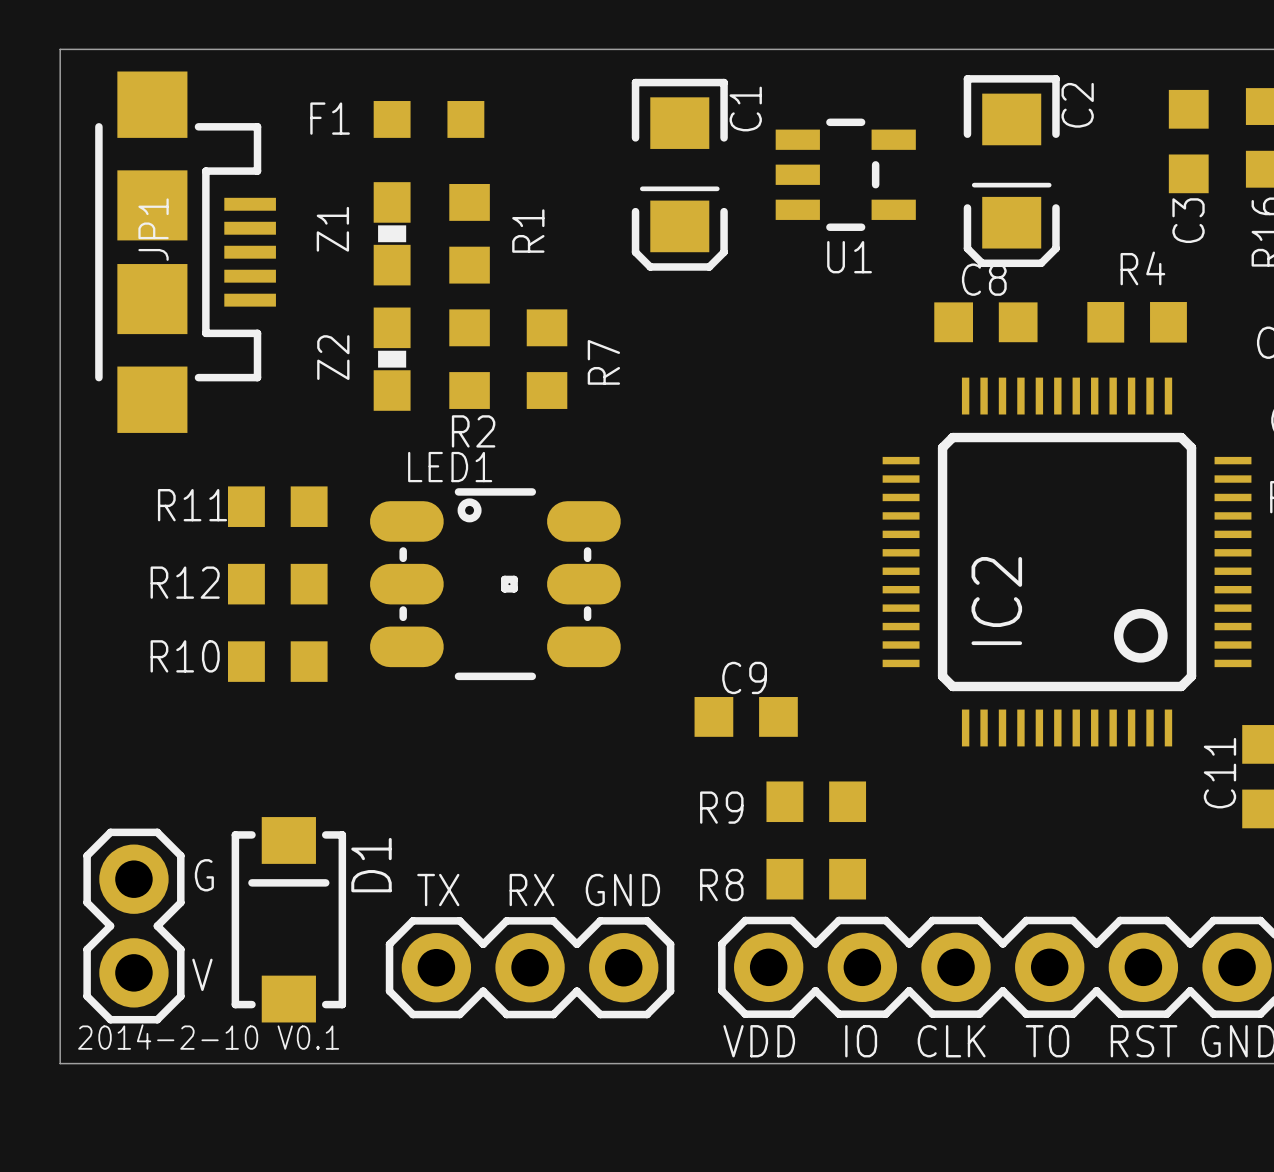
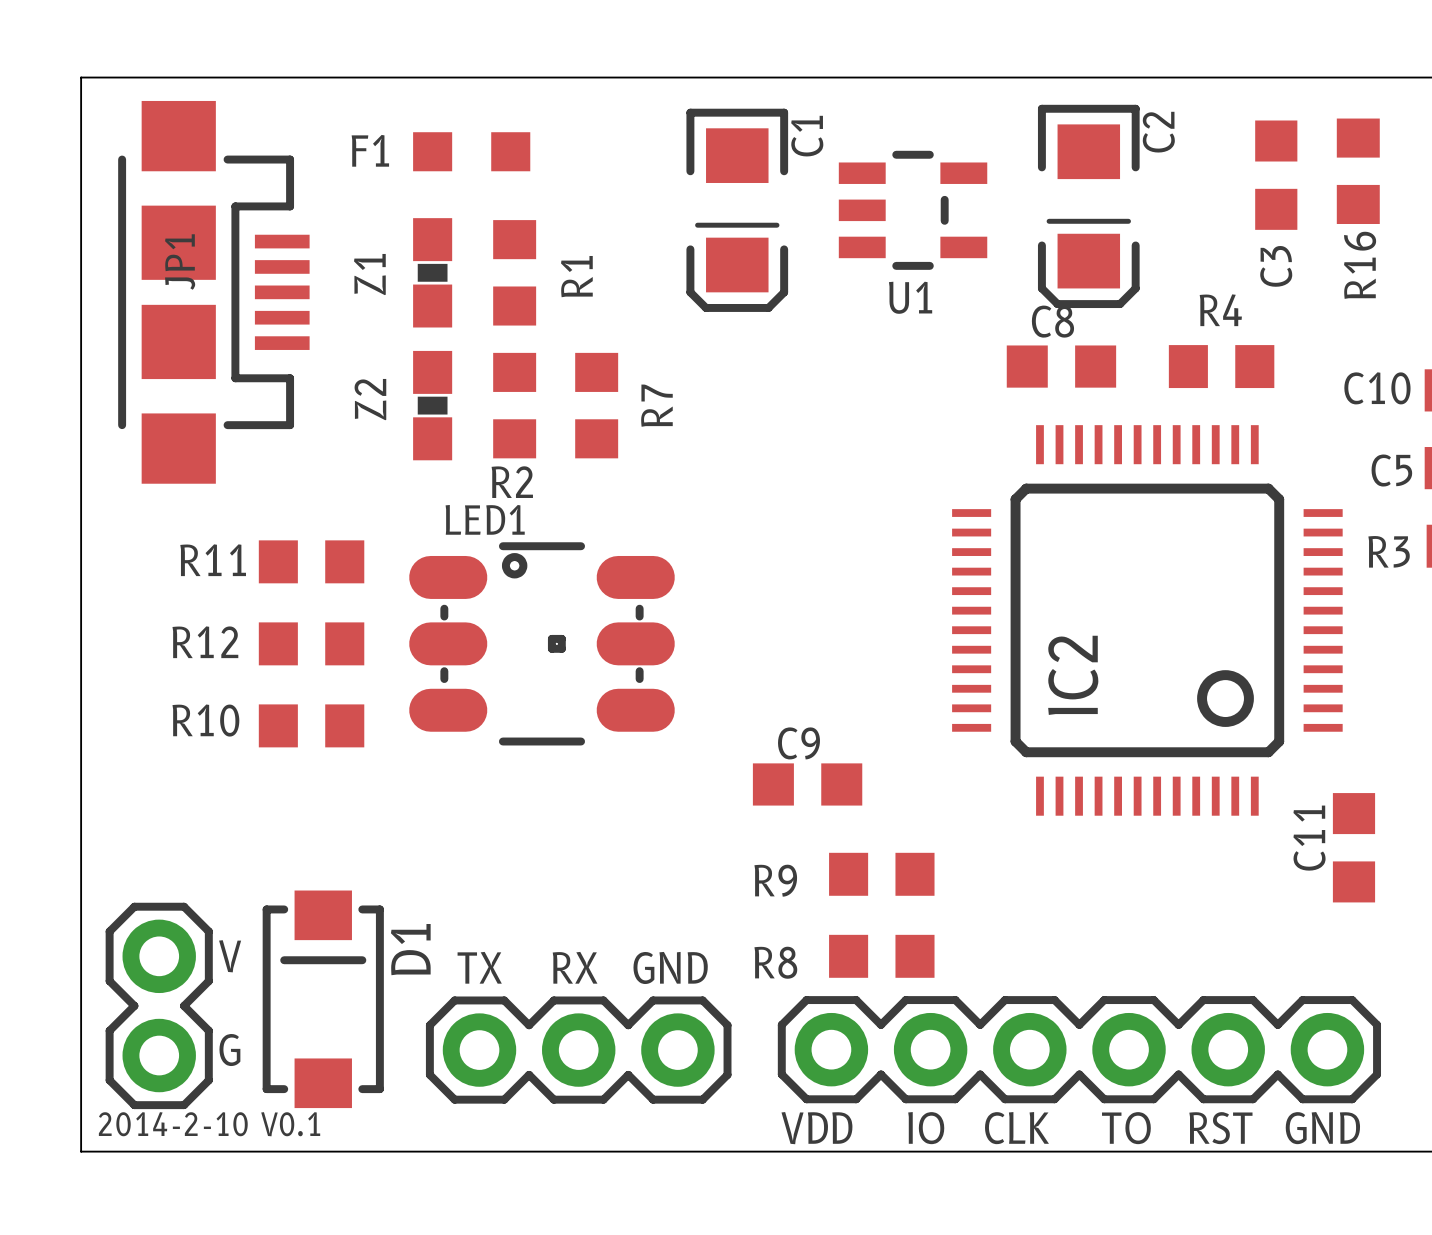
text: G (204, 875) -> V (230, 956)
text: V (202, 974) -> G (229, 1050)

